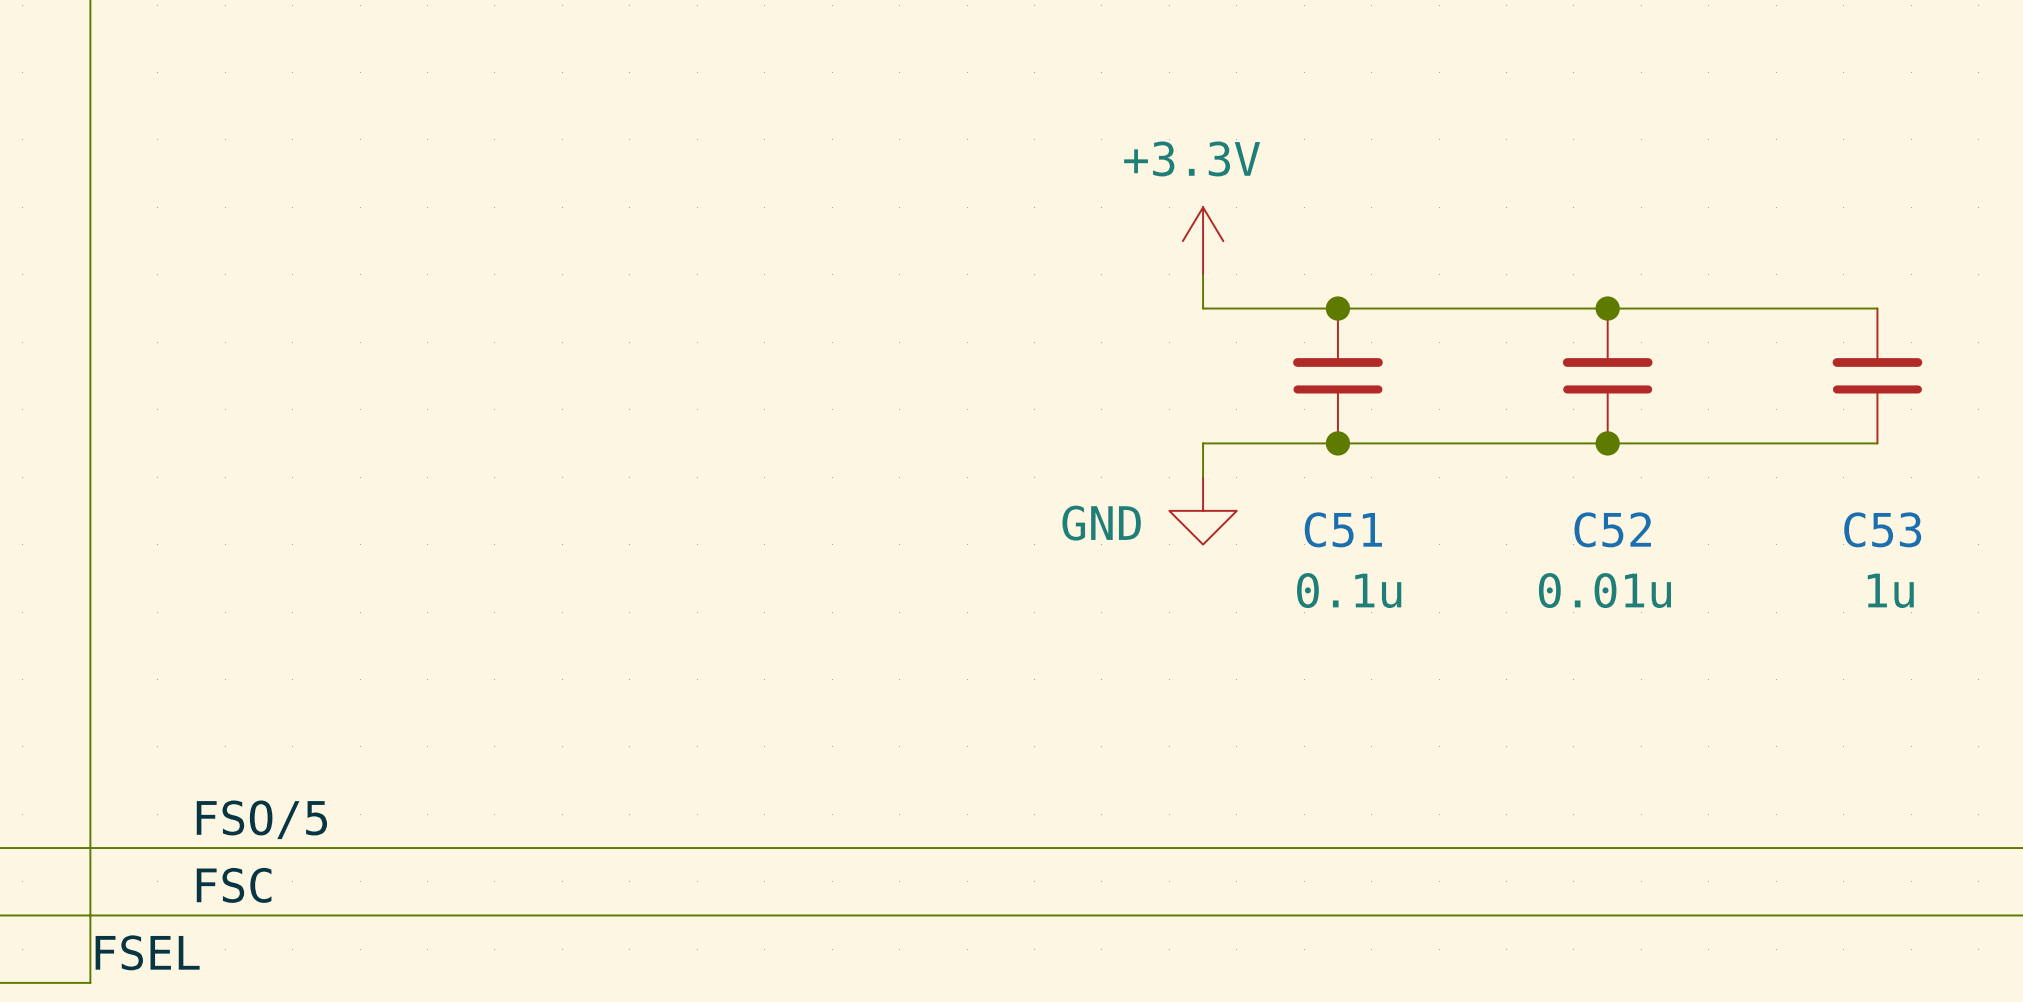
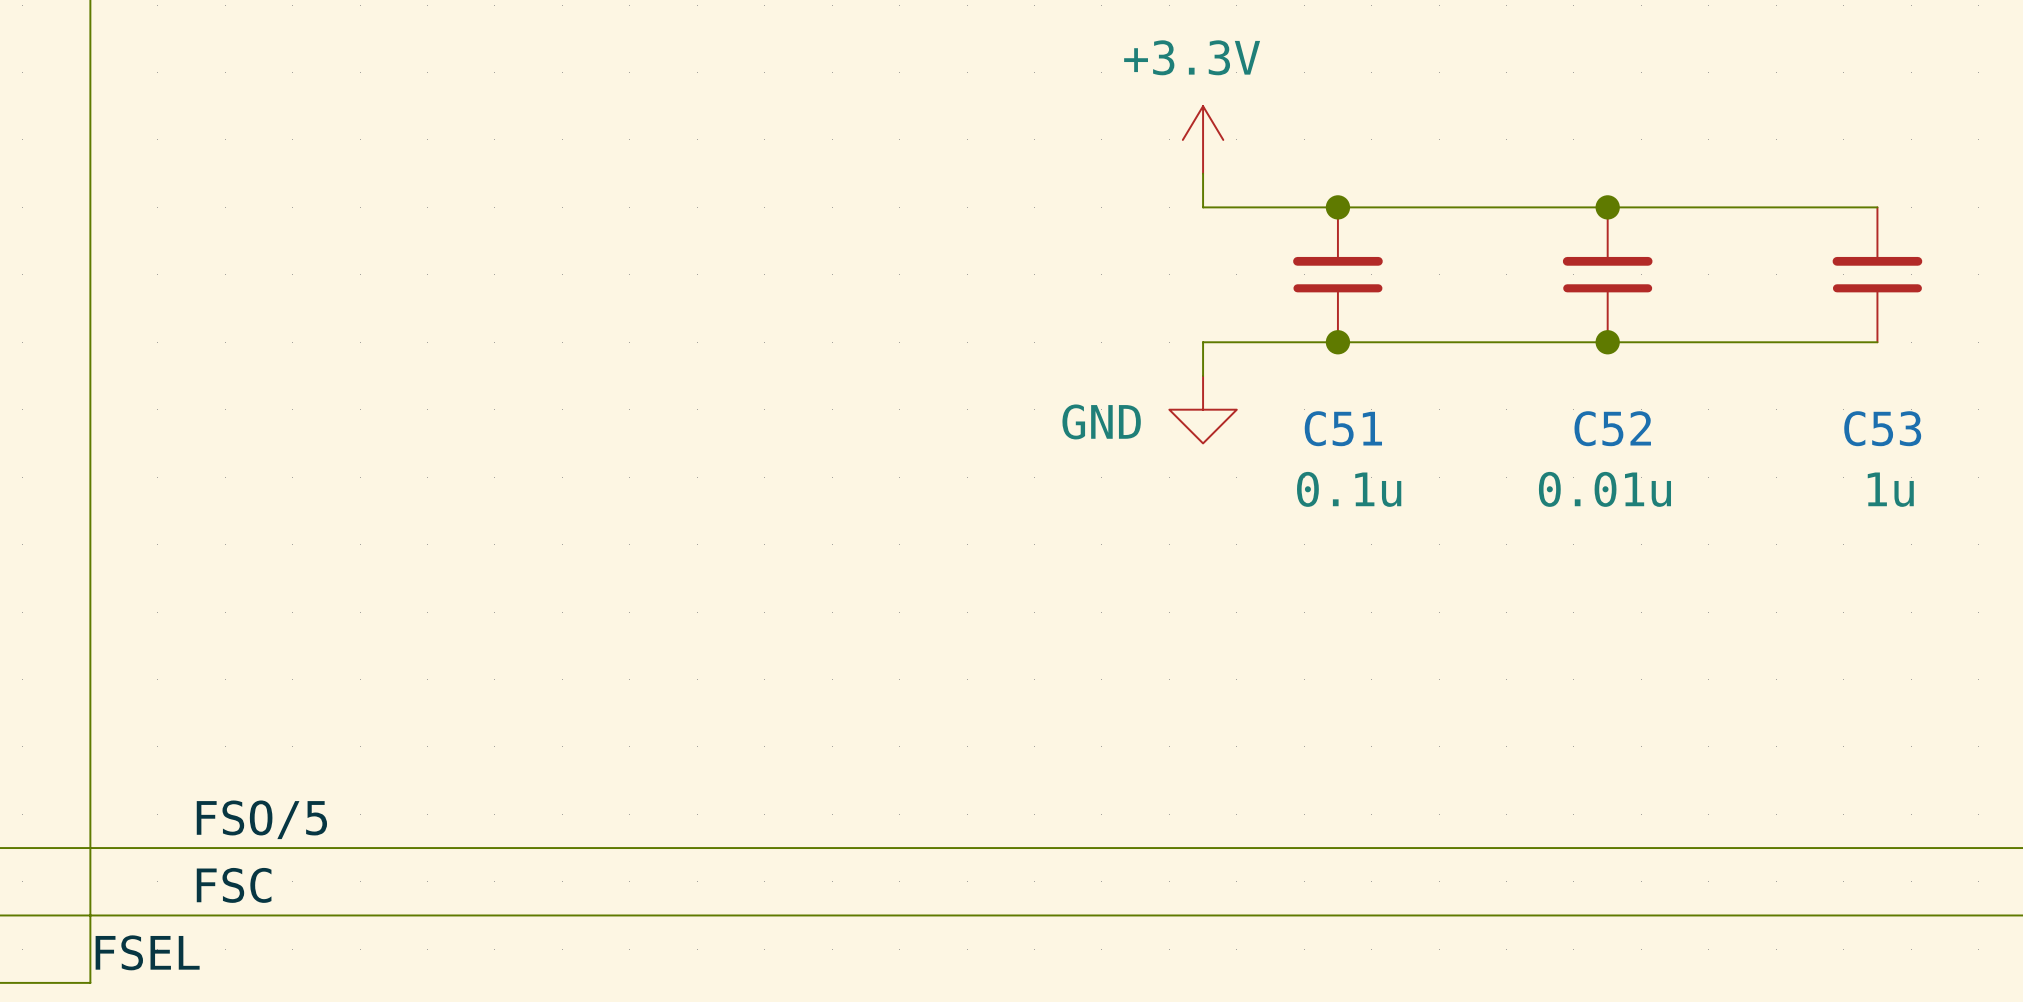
junction: none -> (1337, 207)
junction: none -> (1607, 207)
power symbol position: +3.3V (1203, 241) -> +3.3V (1203, 139)
wire: (1203, 274) (1203, 308) (1877, 308) -> (1203, 173) (1203, 207) (1877, 207)
junction position: (1337, 308) -> (1337, 342)
junction position: (1607, 308) -> (1607, 342)
C51 position: (1337, 375) -> (1337, 274)
C52 position: (1607, 375) -> (1607, 274)
C53 position: (1877, 375) -> (1877, 274)
junction: (1337, 443) -> none
junction: (1607, 443) -> none
wire: (1877, 443) (1203, 443) (1203, 477) -> (1877, 342) (1203, 342) (1203, 375)
power symbol position: GND (1203, 510) -> GND (1203, 409)

